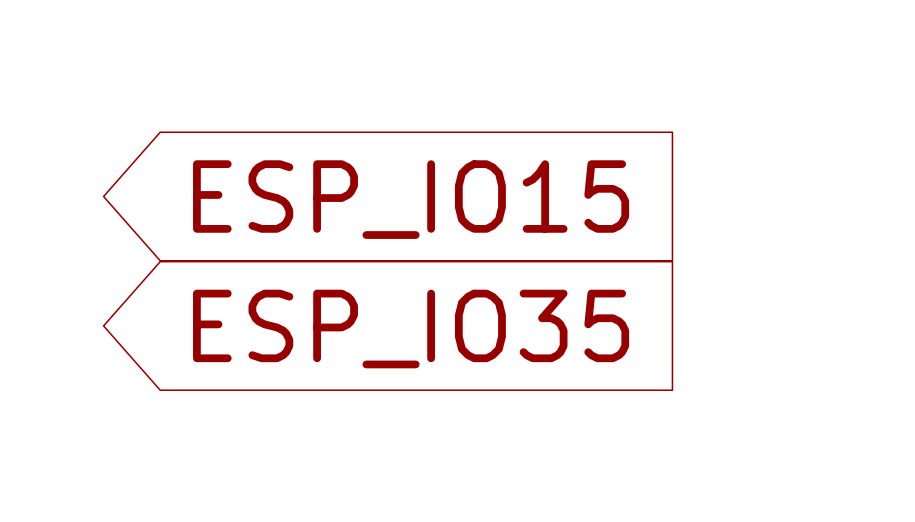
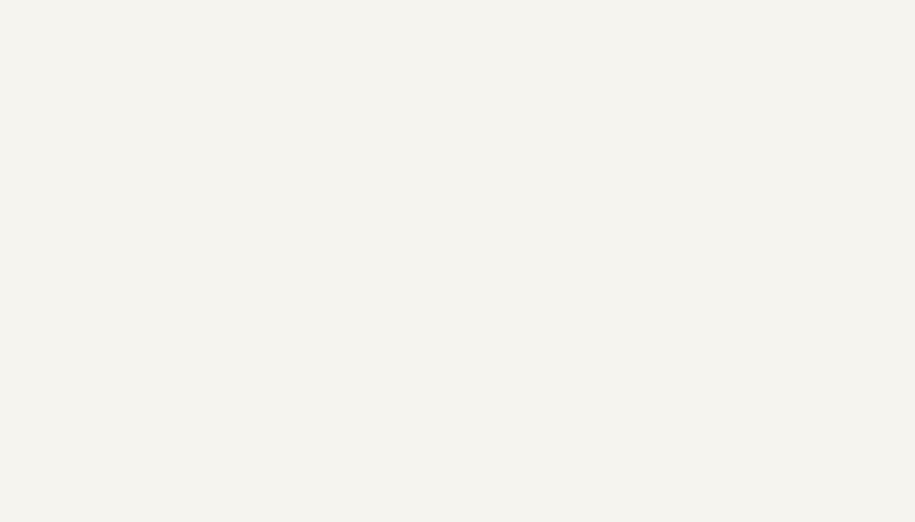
global label: ESP_IO15 (411, 199) -> none
global label: ESP_IO35 (411, 329) -> none

